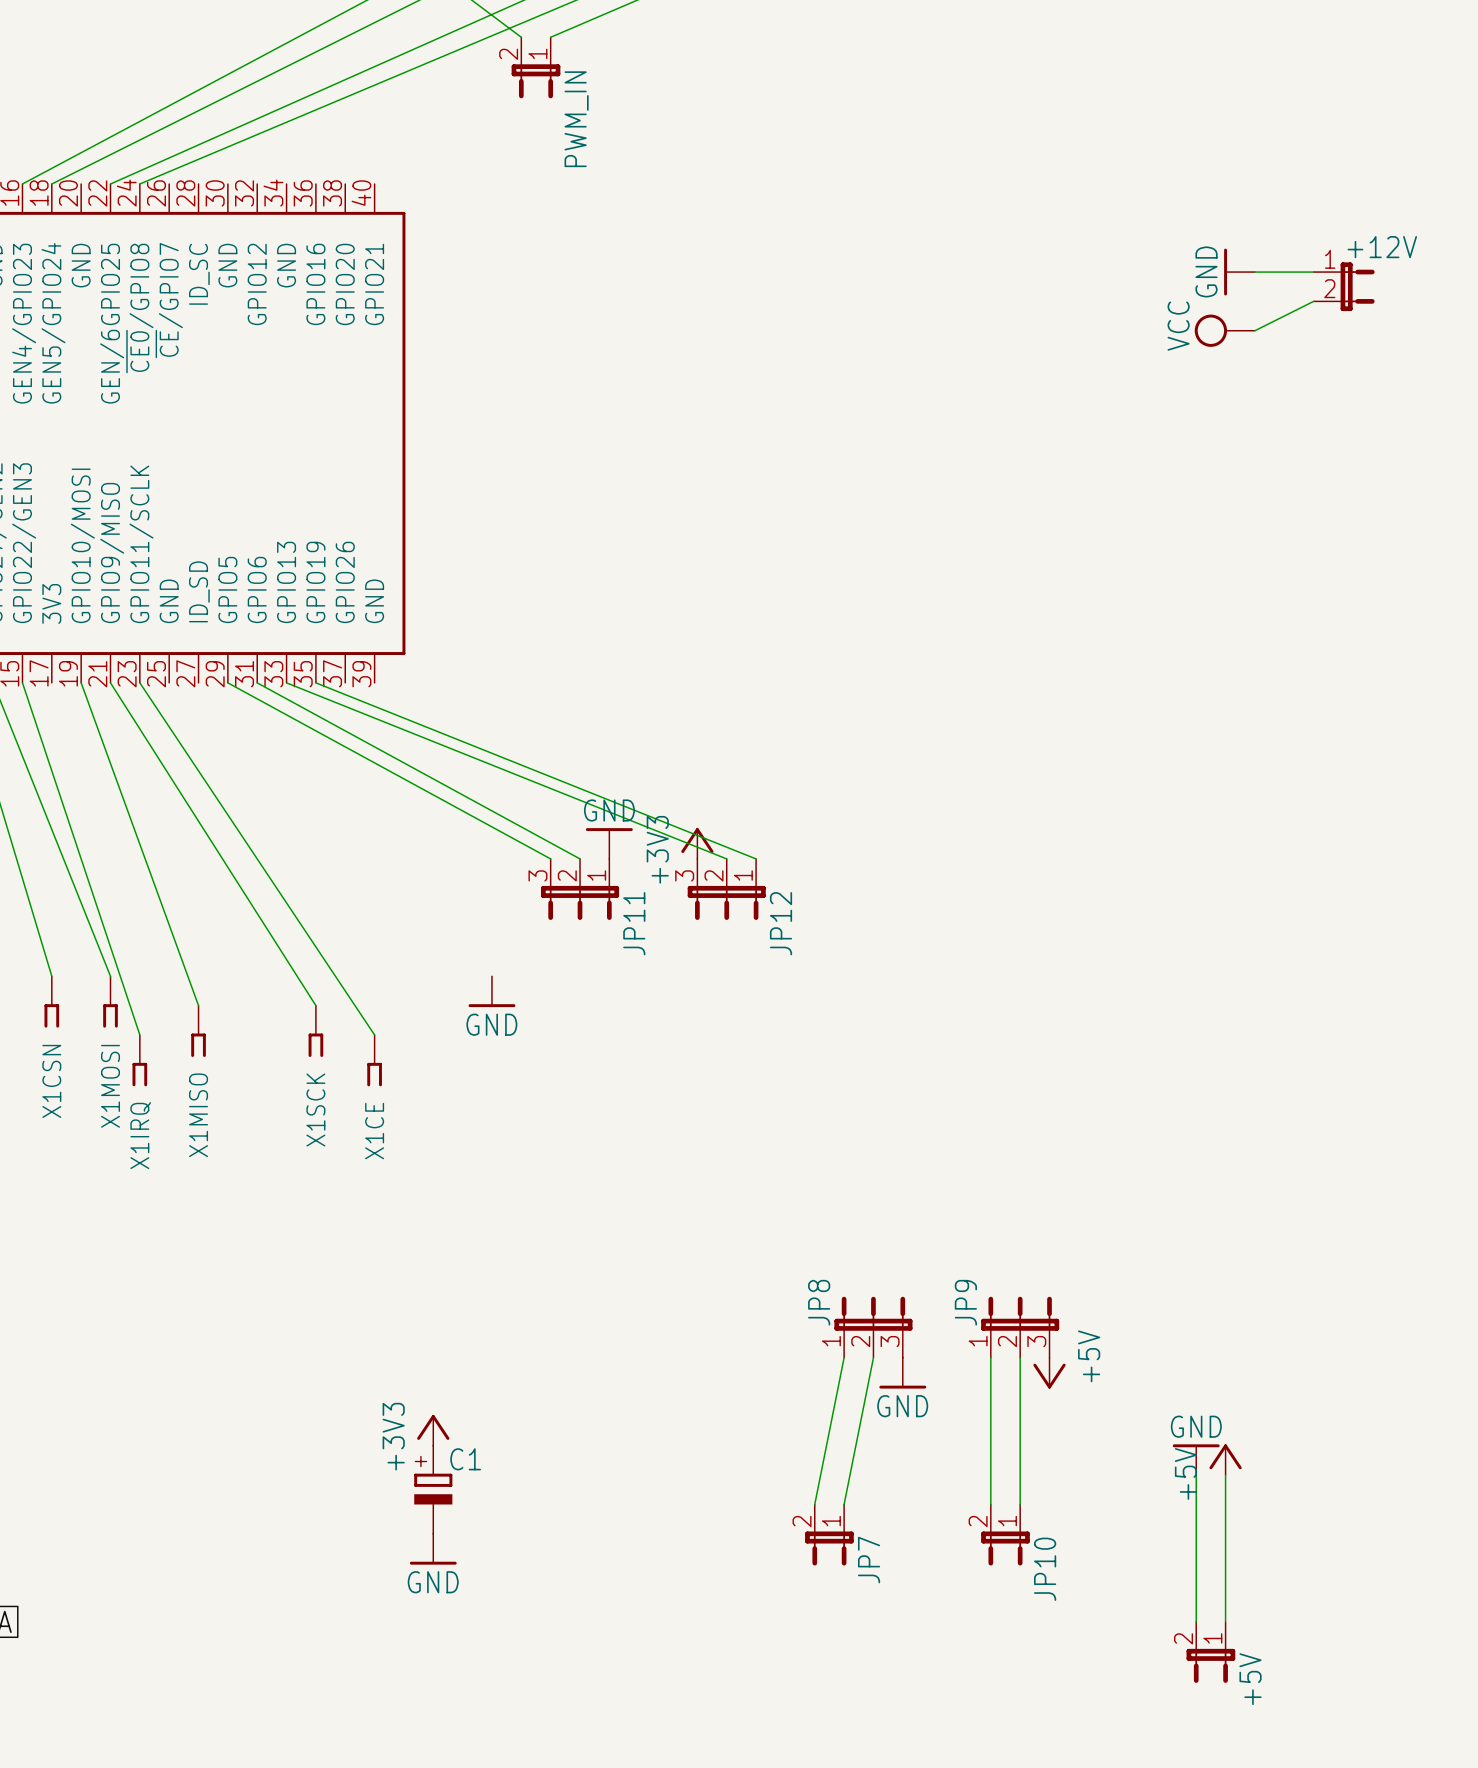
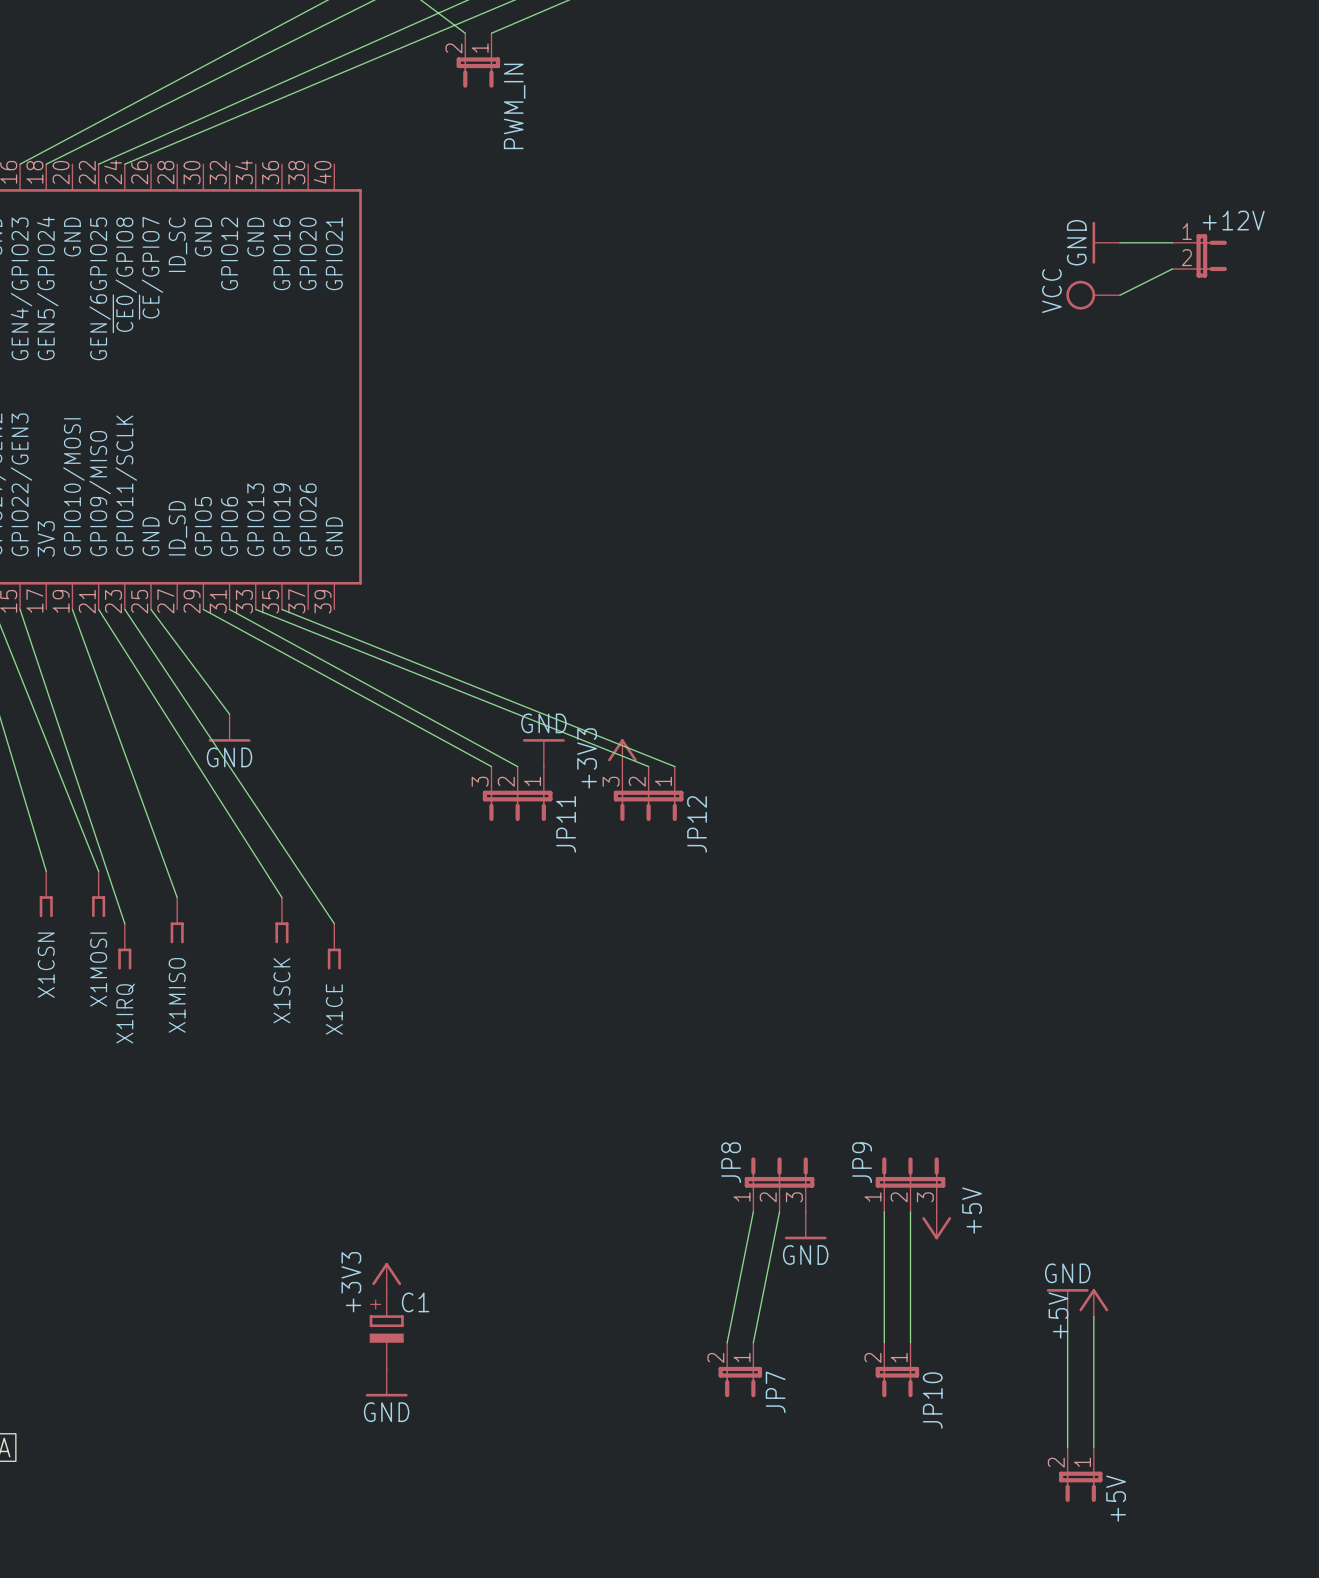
wire: none -> (151, 609) (229, 714)
power symbol: none -> GND (229, 727)
power symbol: GND (491, 991) -> none

